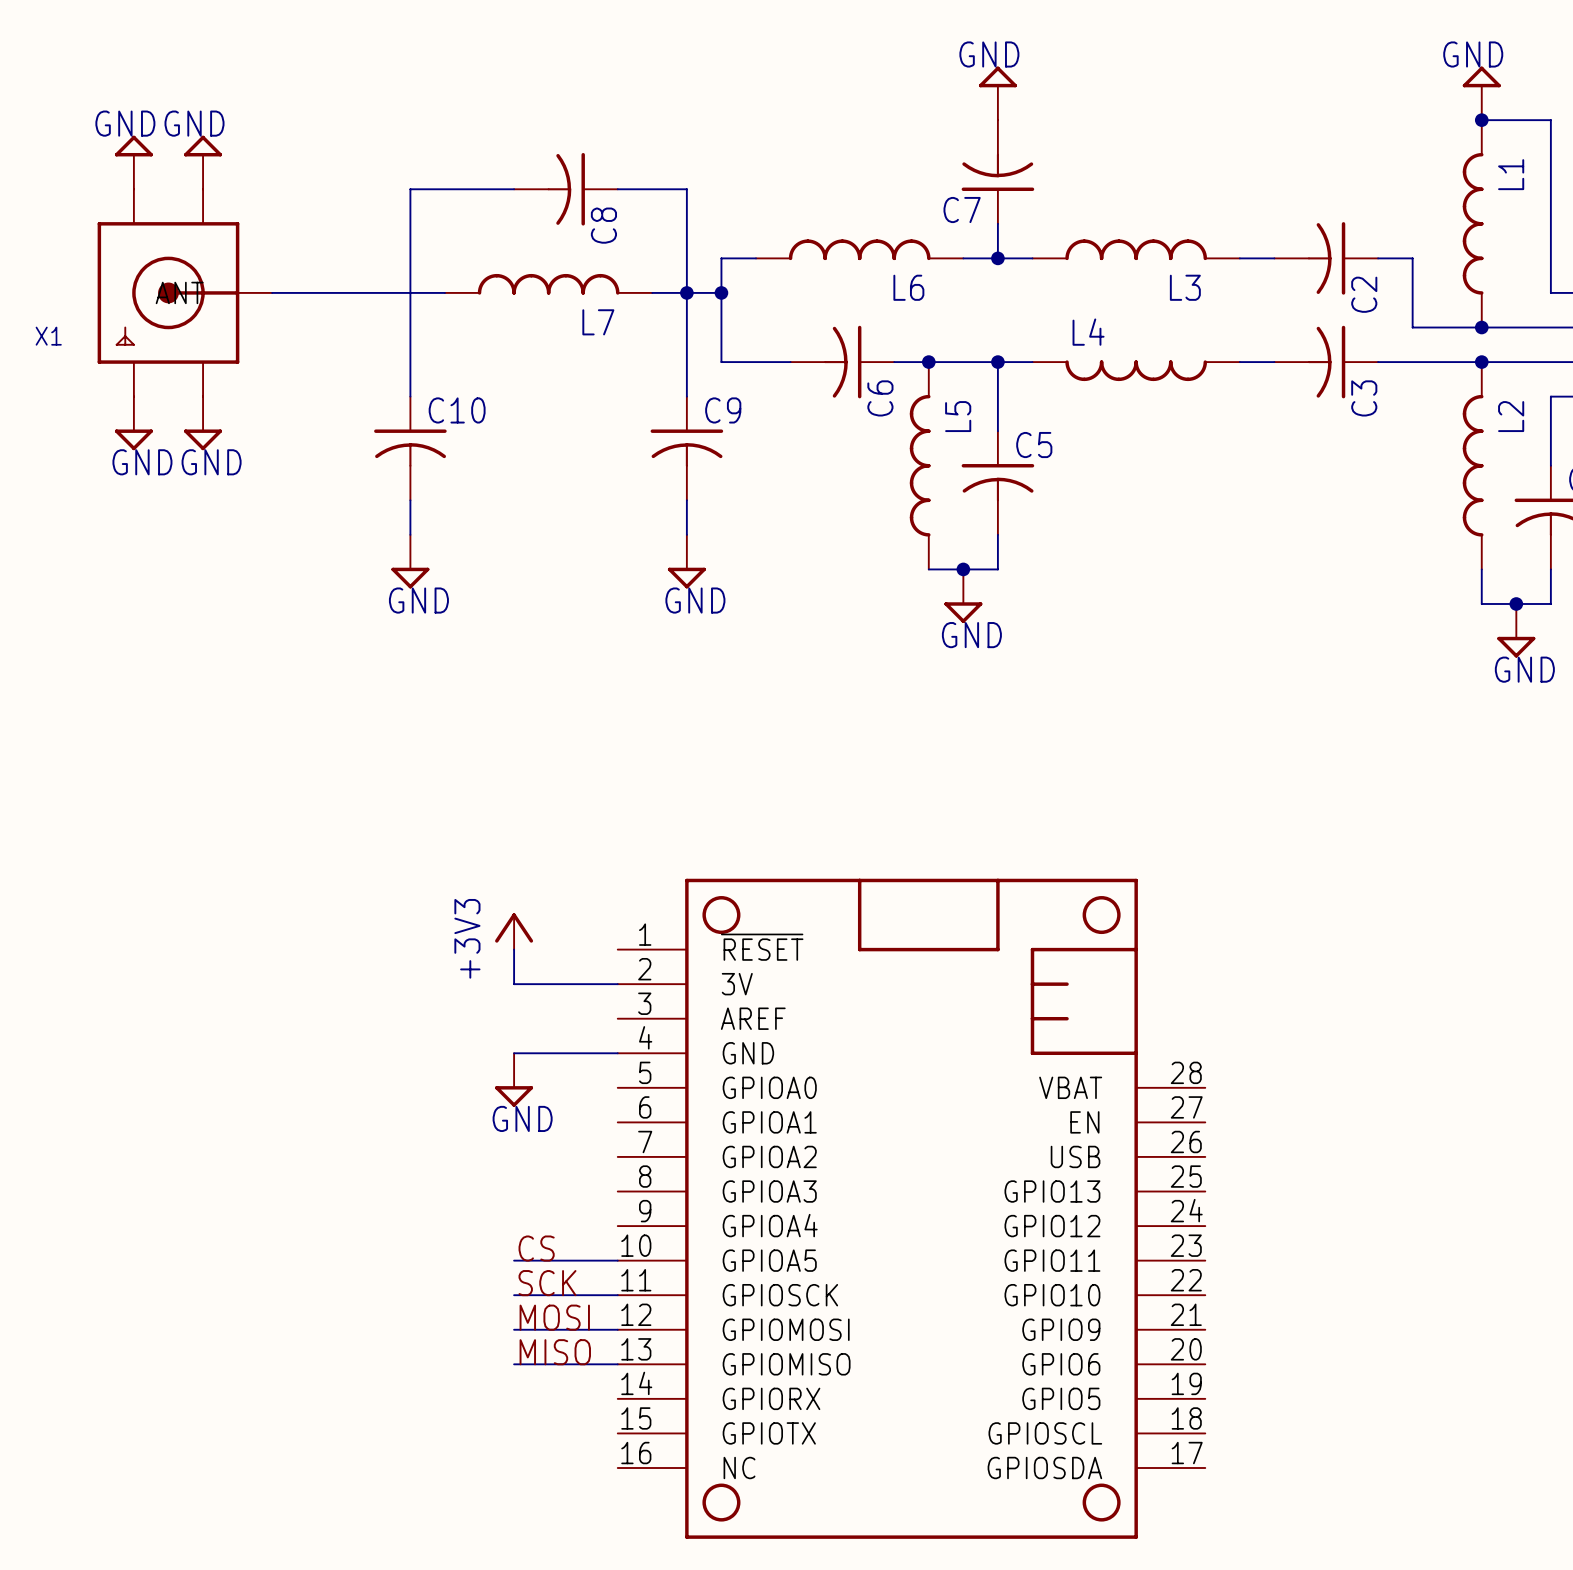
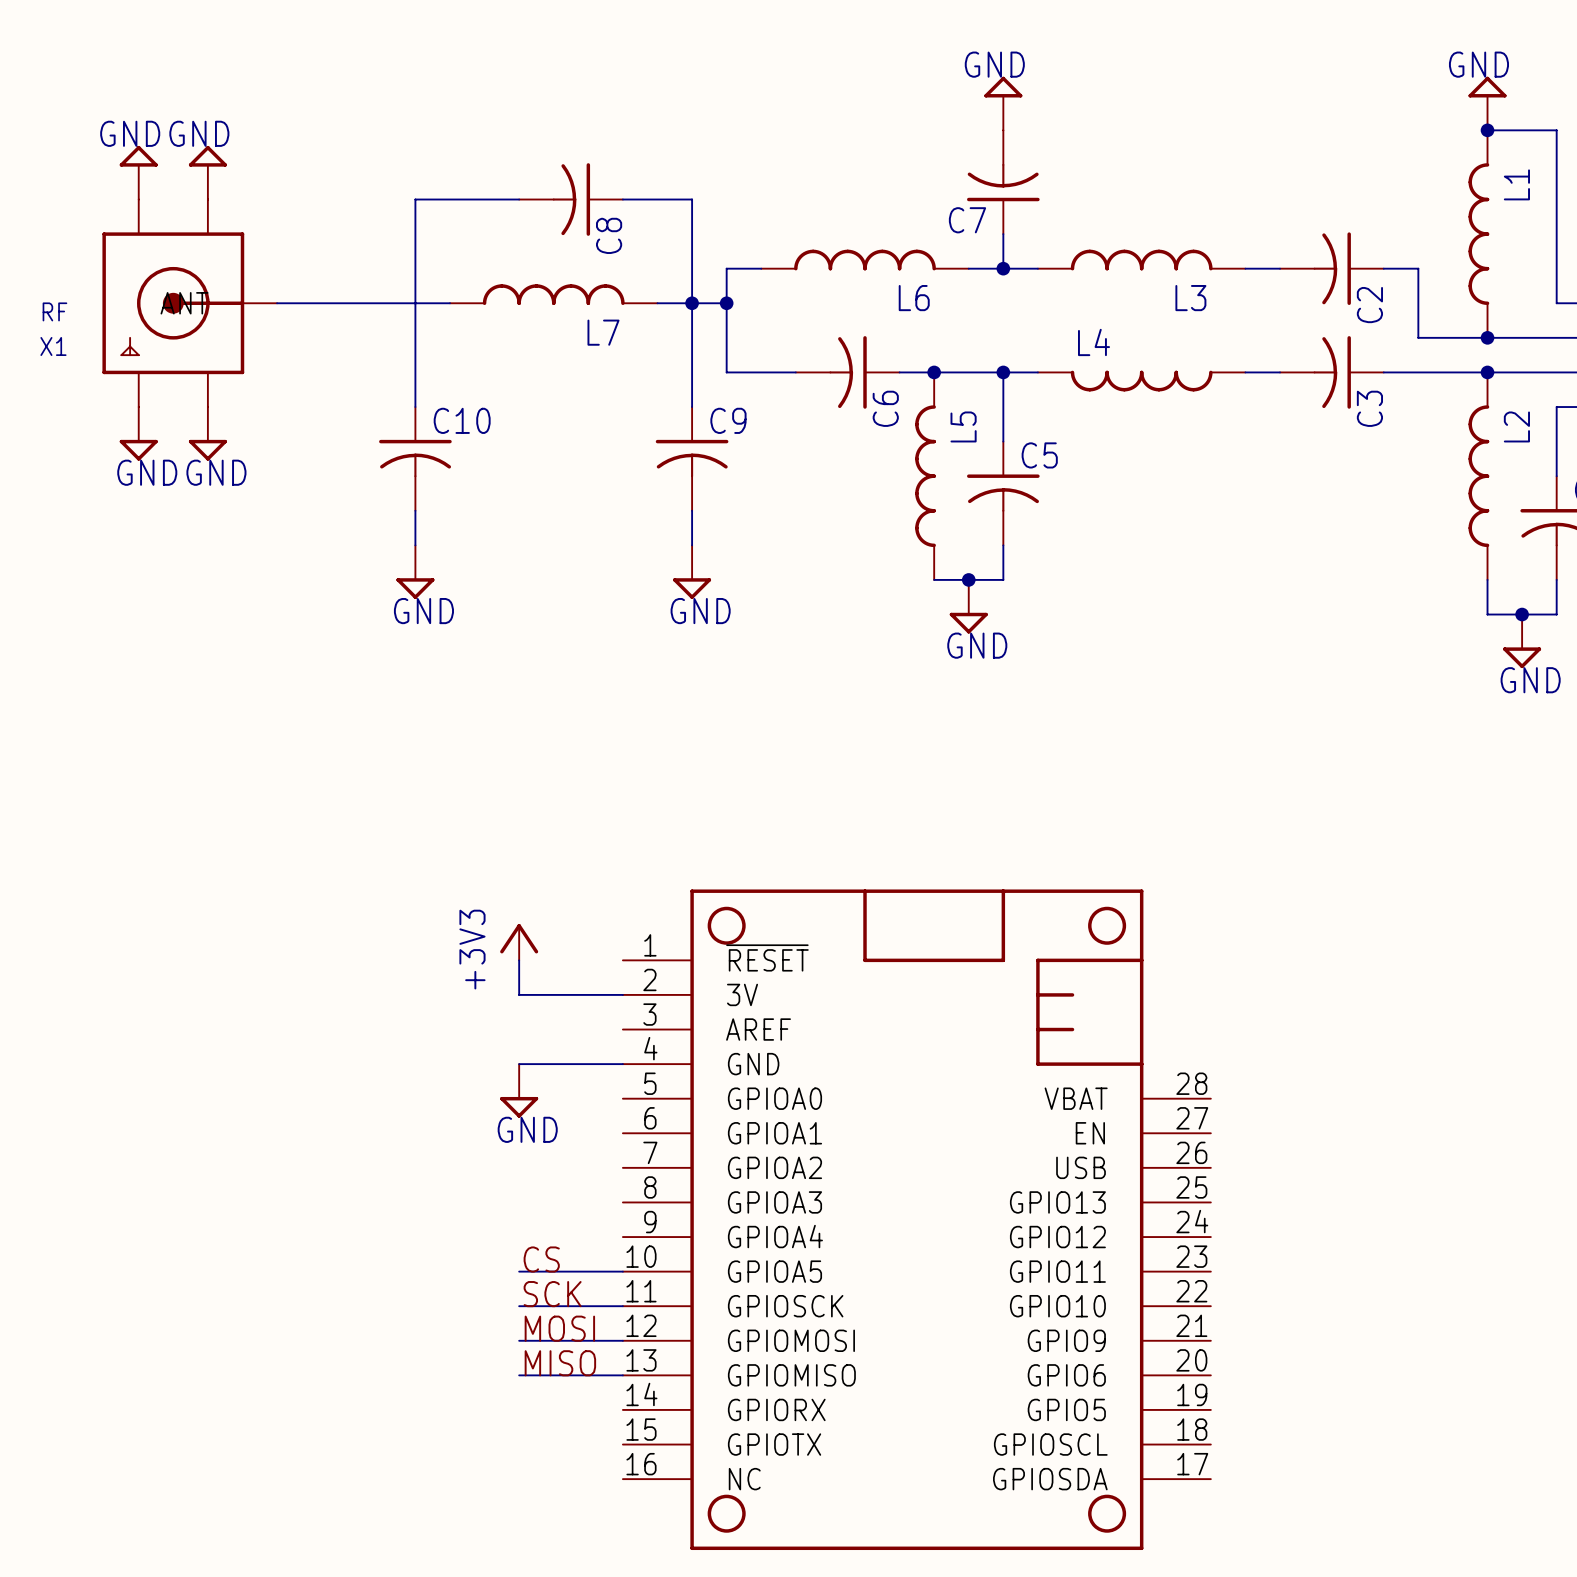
X1 value: none -> RF (54, 311)

